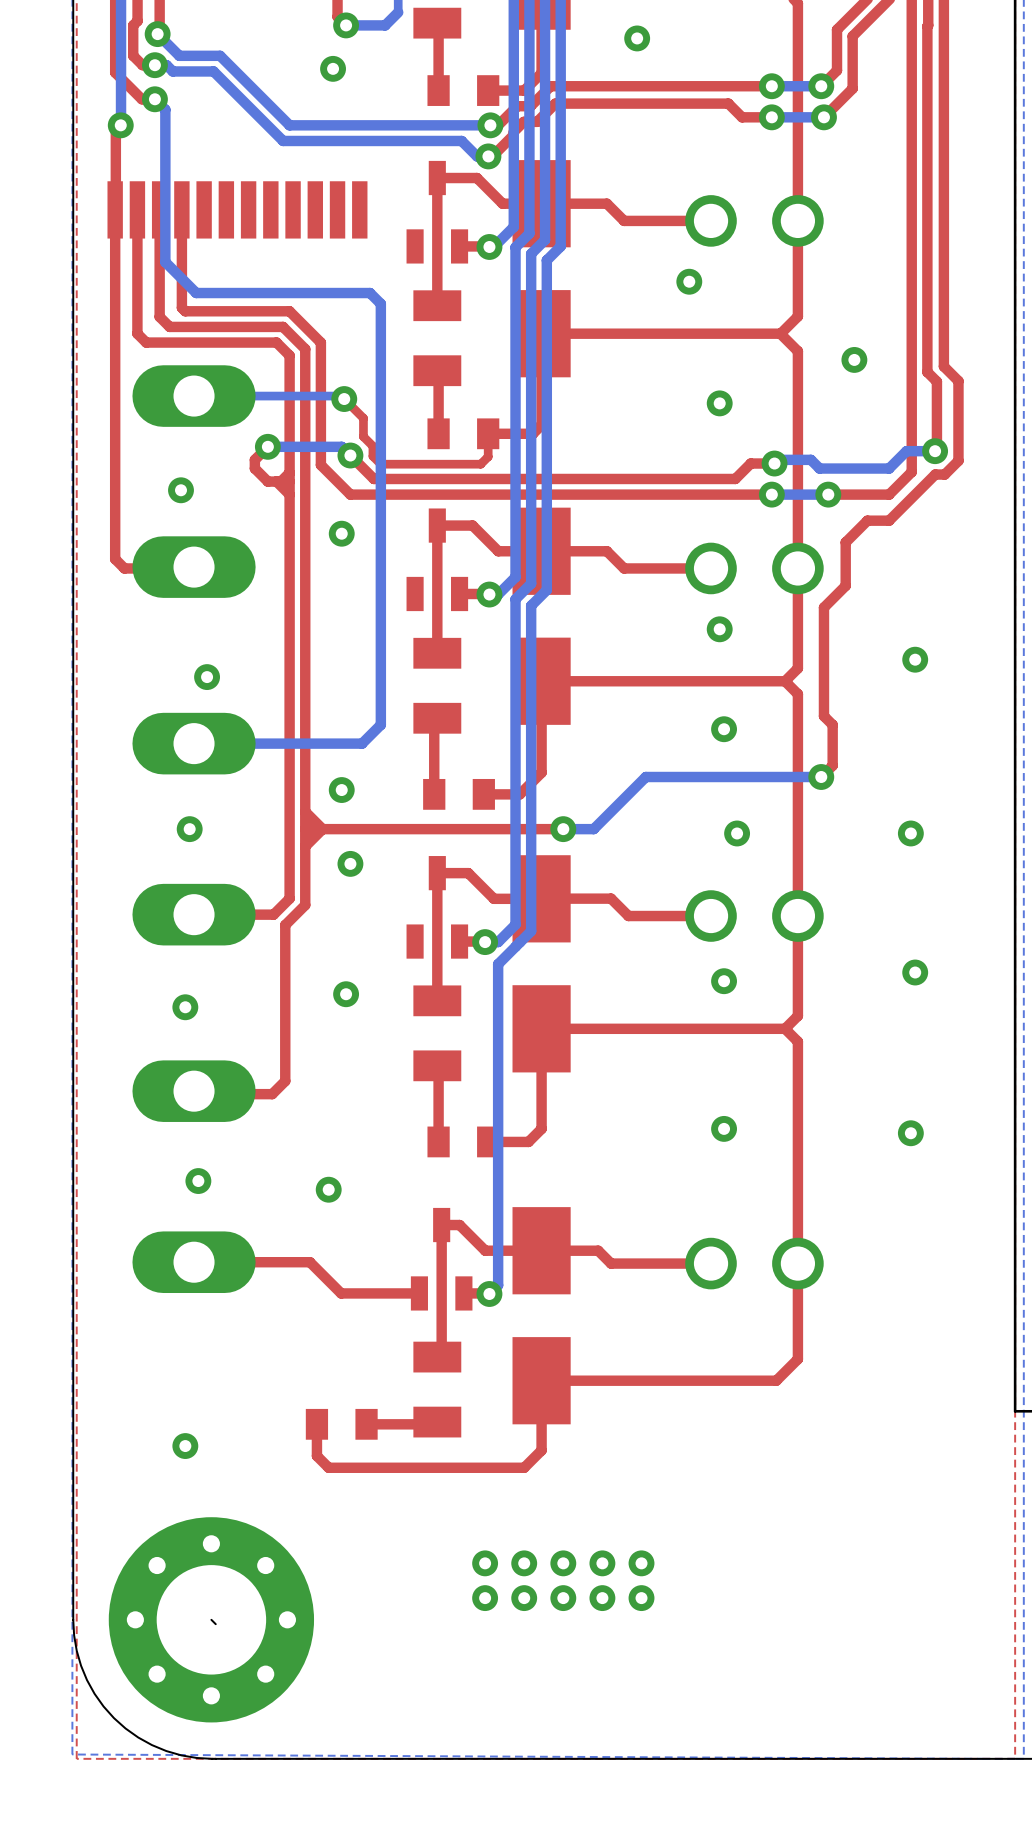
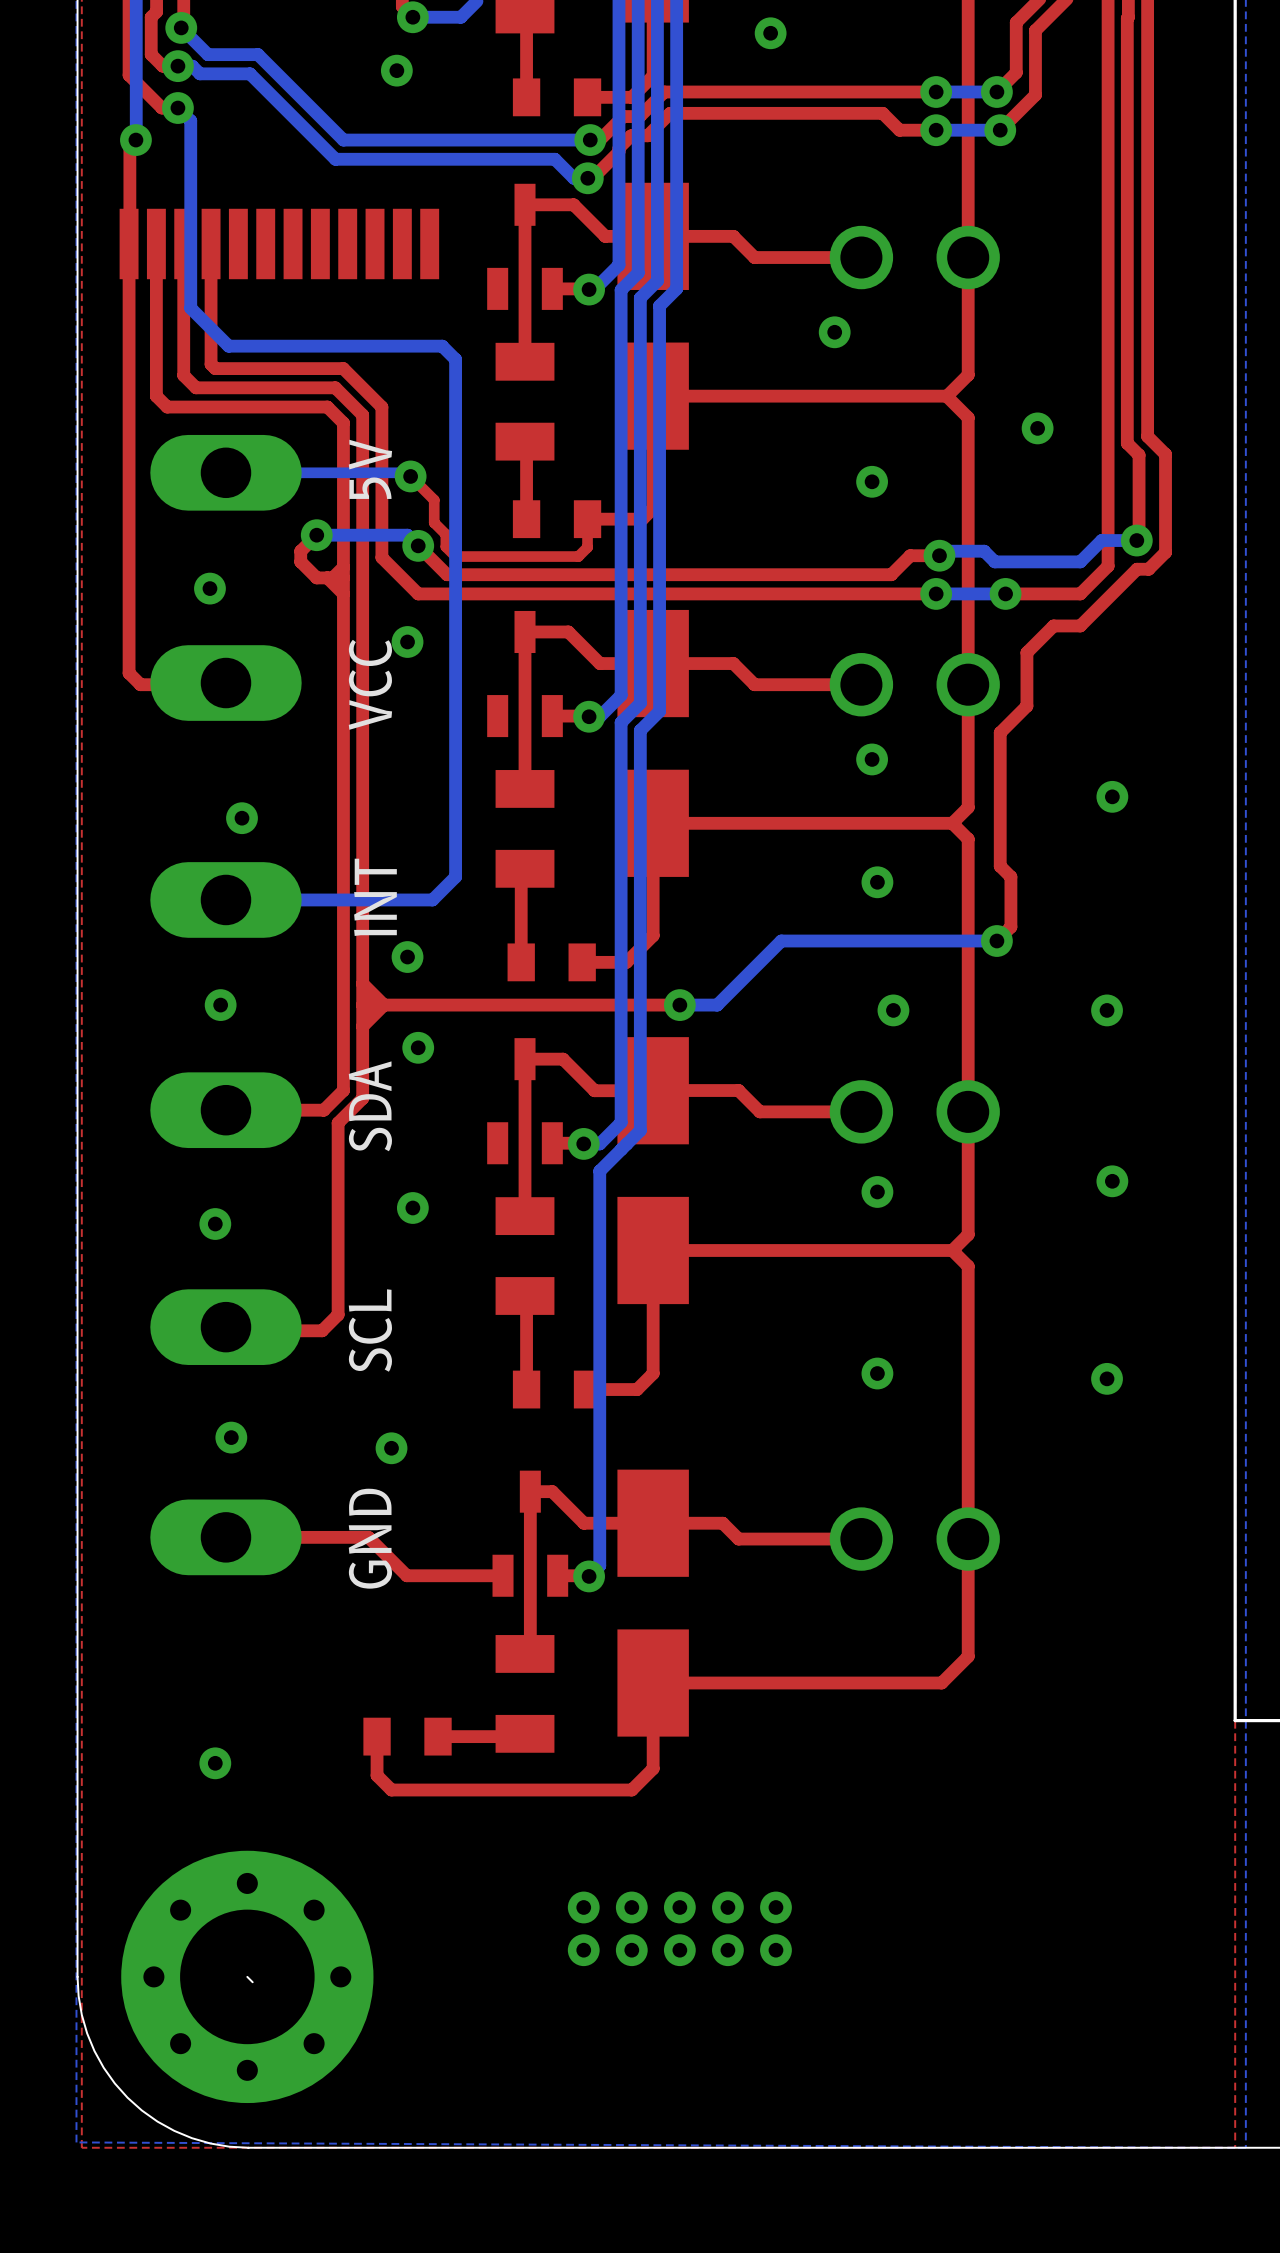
text: none -> 5V (370, 469)
text: none -> VCC (370, 684)
text: none -> INT (375, 897)
text: none -> SDA (370, 1106)
text: none -> SCL (370, 1330)
text: none -> GND (370, 1538)

